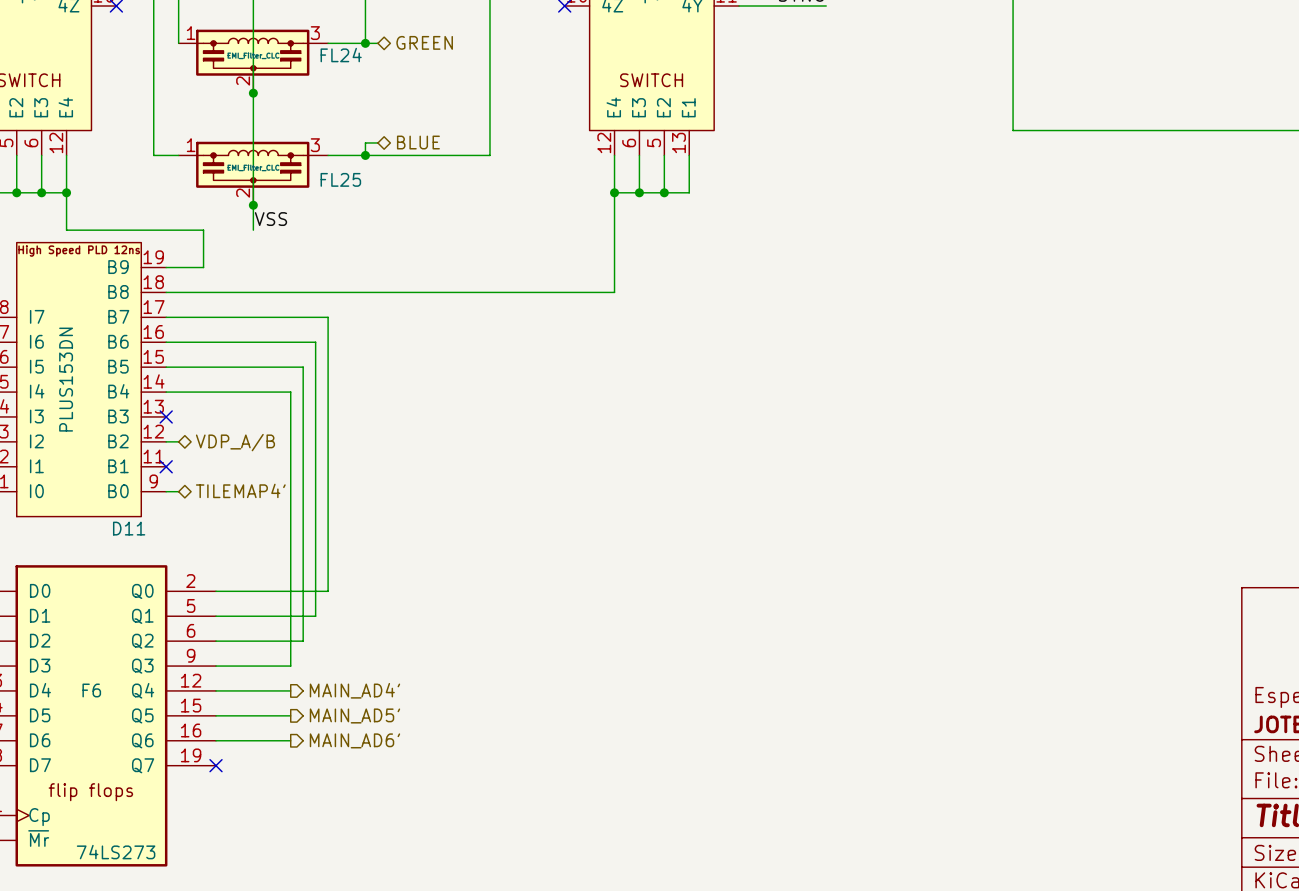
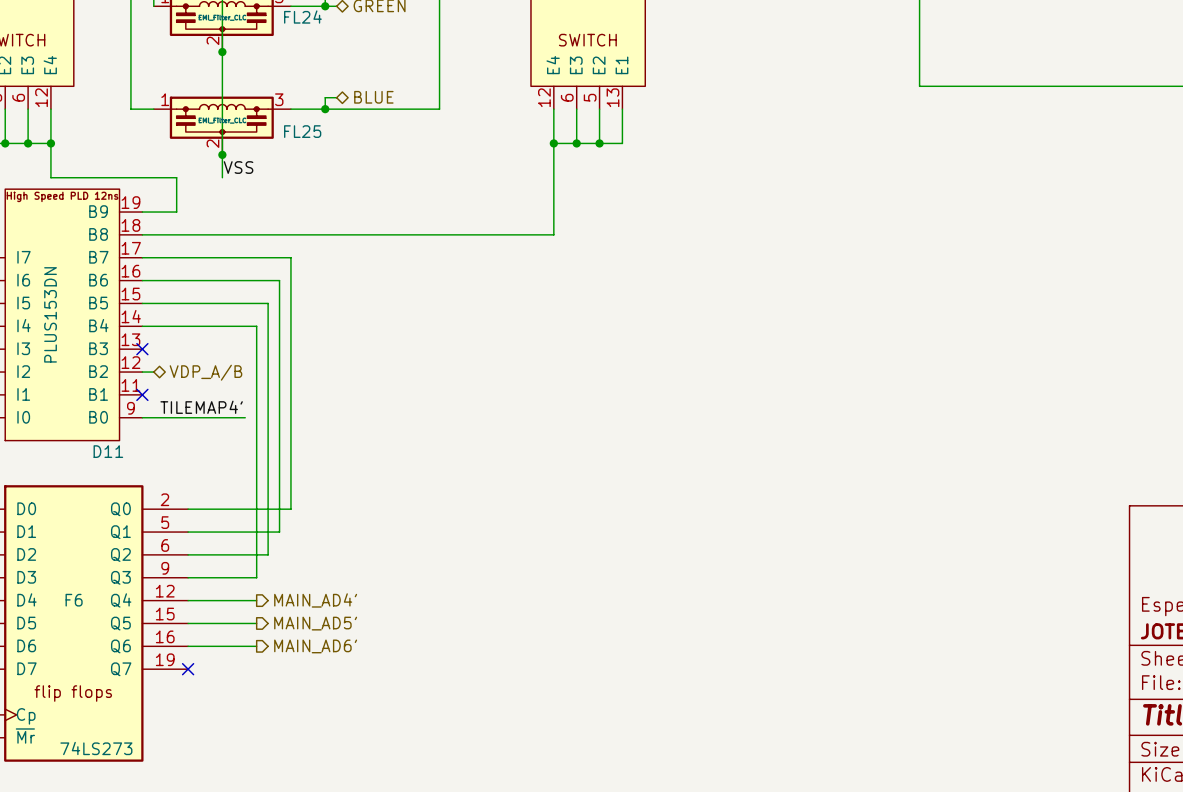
label: none -> TILEMAP4' (201, 407)
hierarchical label: TILEMAP4' (240, 490) -> none
wire: none -> (153, 417) (245, 417)

